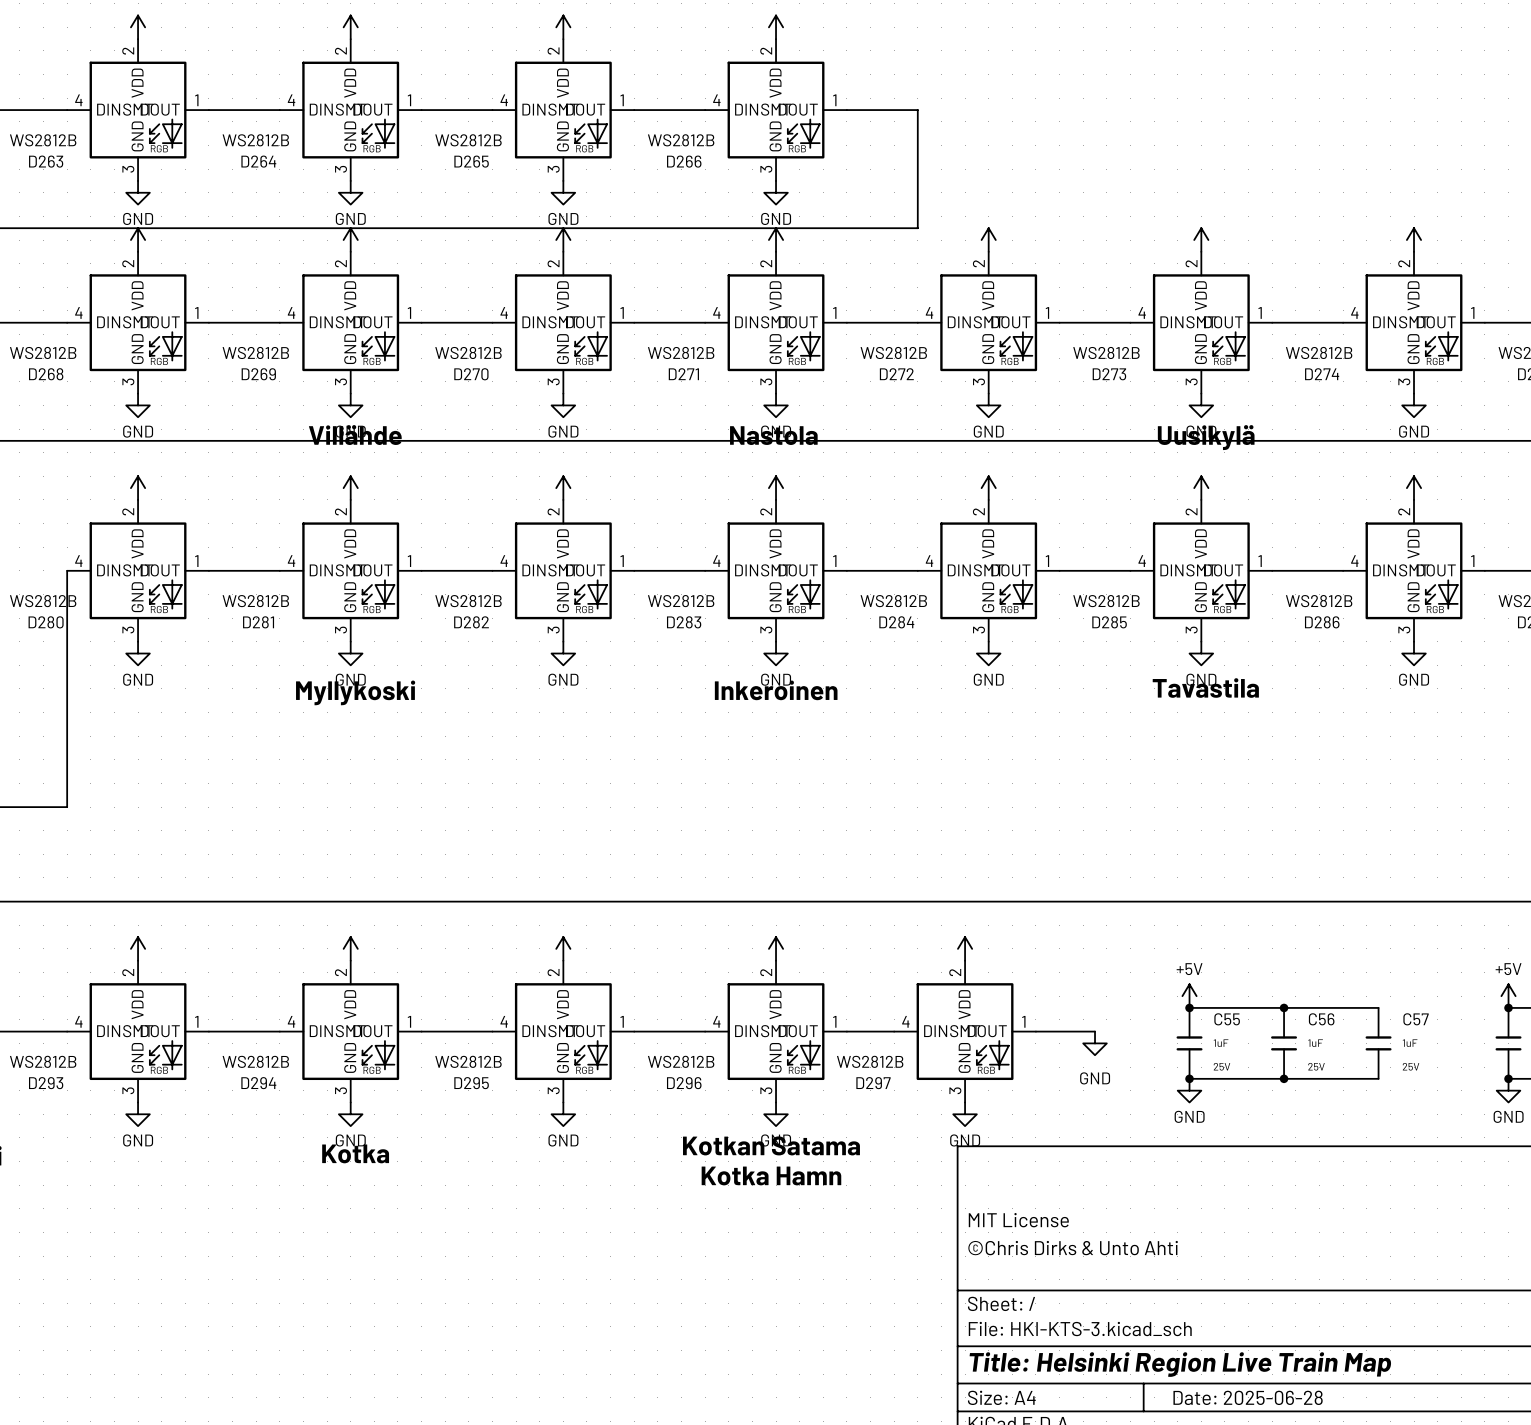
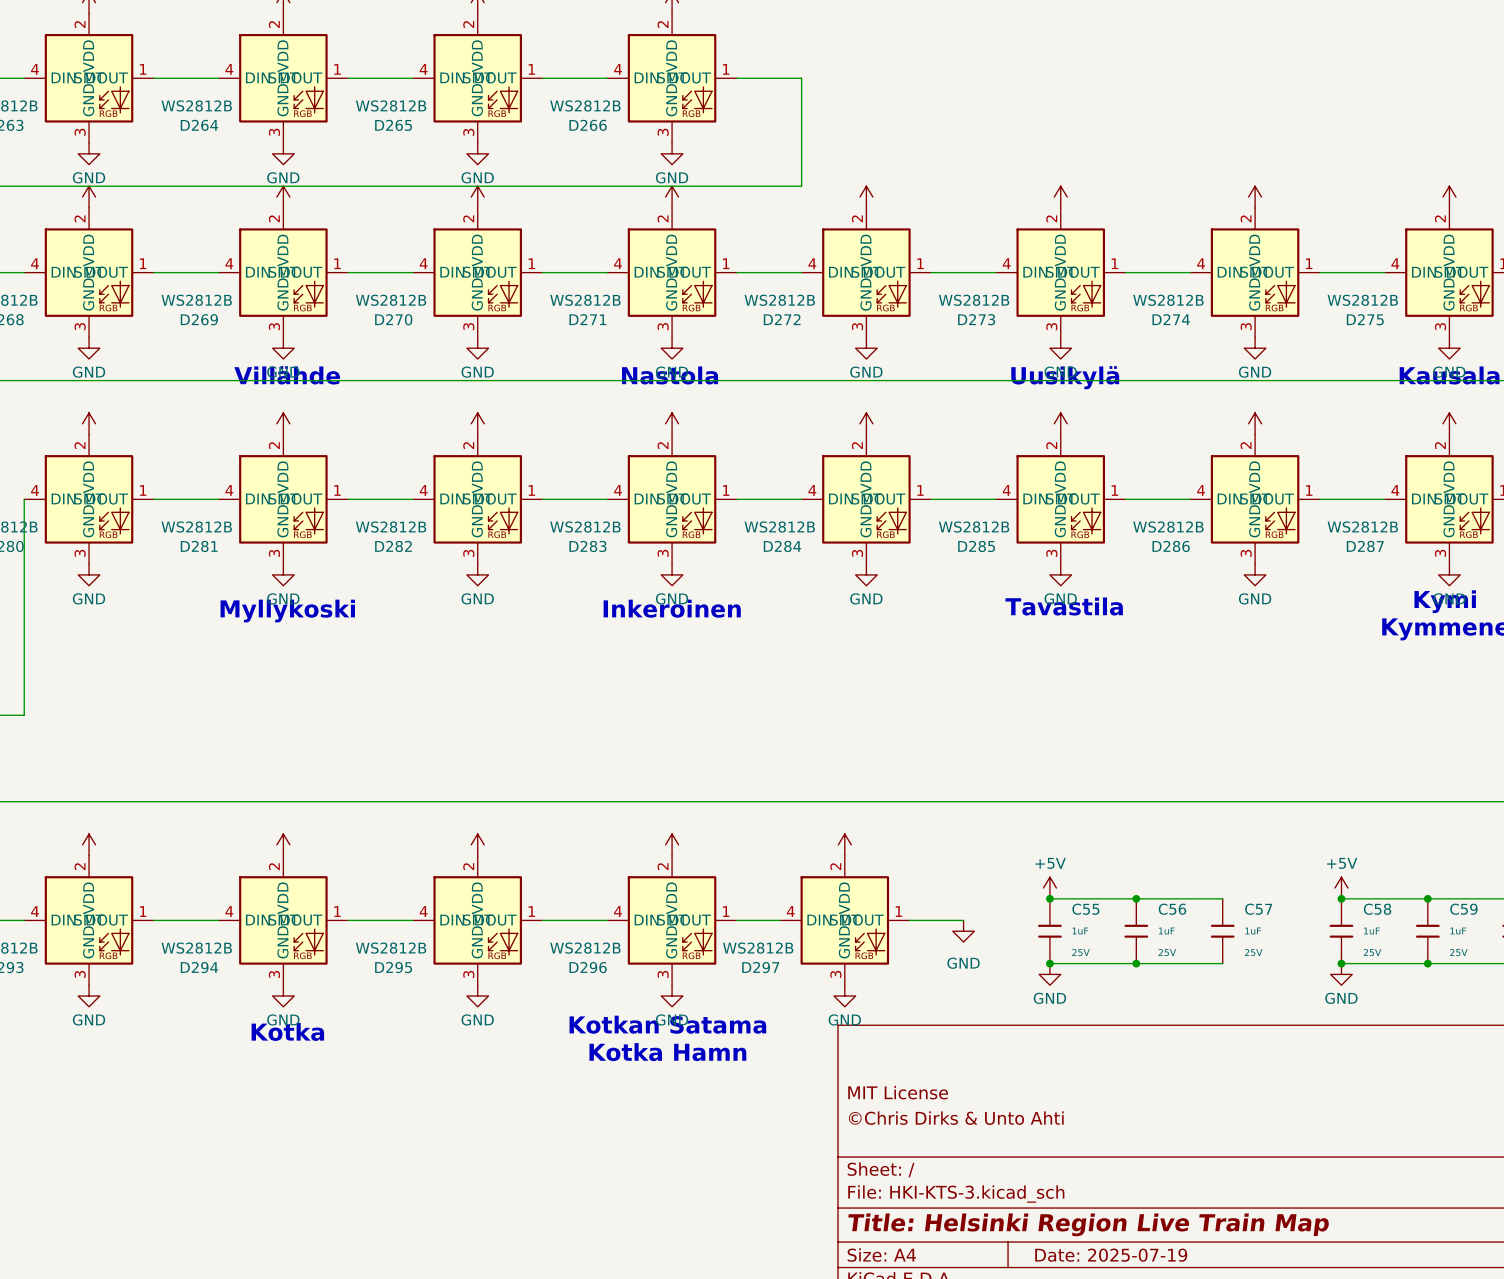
title block: Date: 2025-06-28 (1248, 1397) -> Date: 2025-07-19 (1111, 1255)

